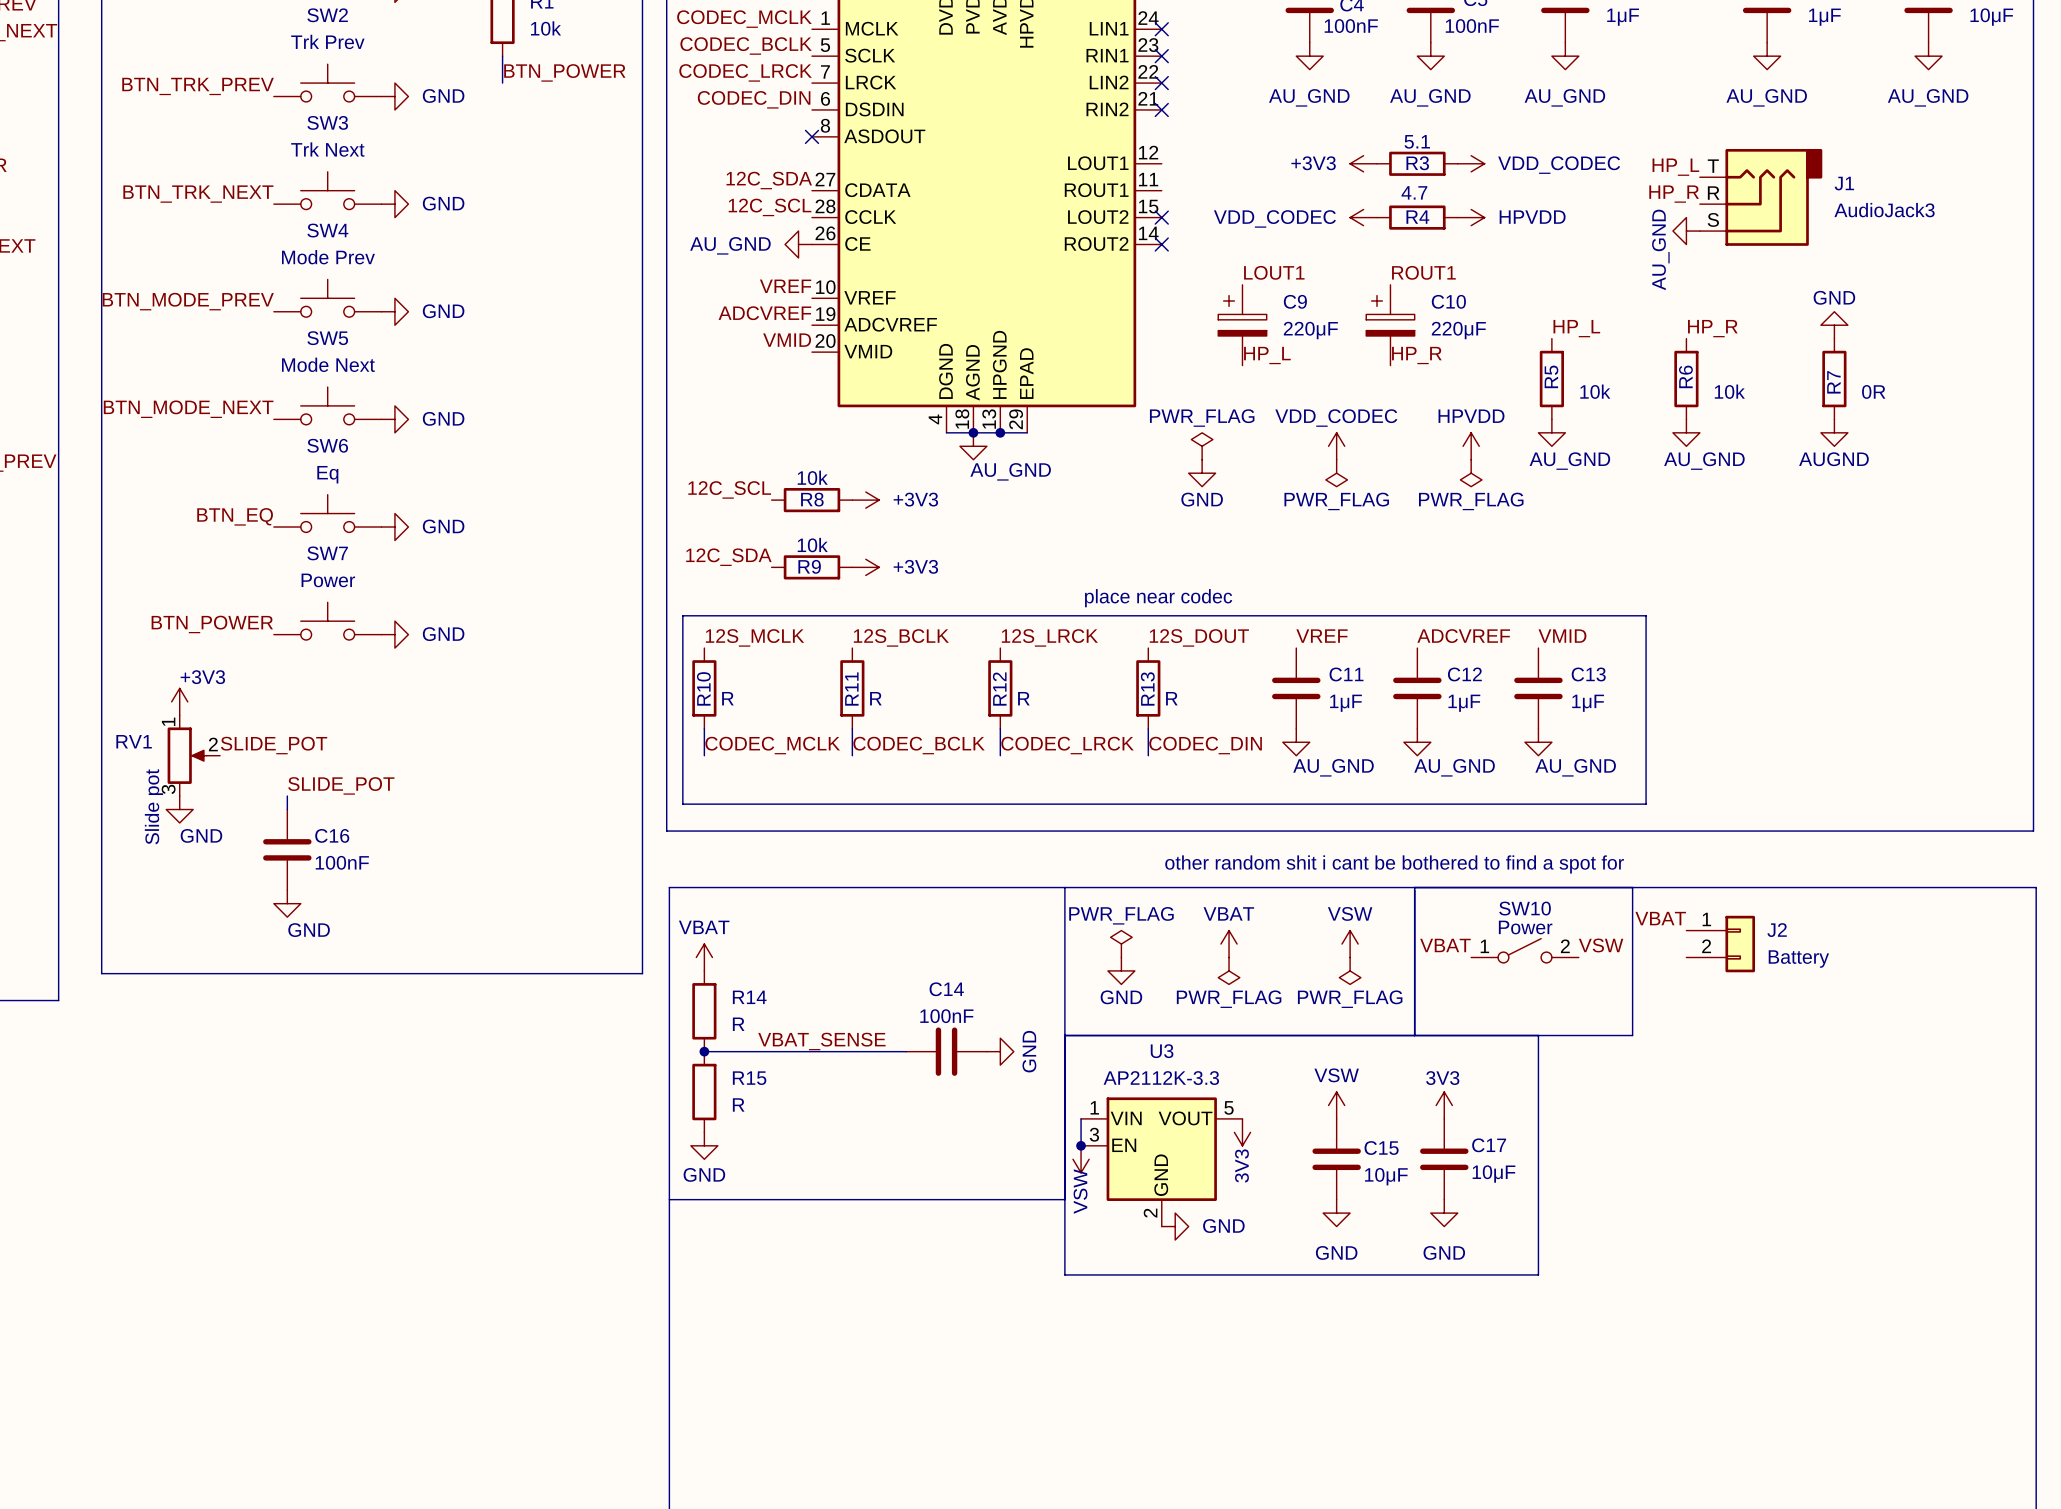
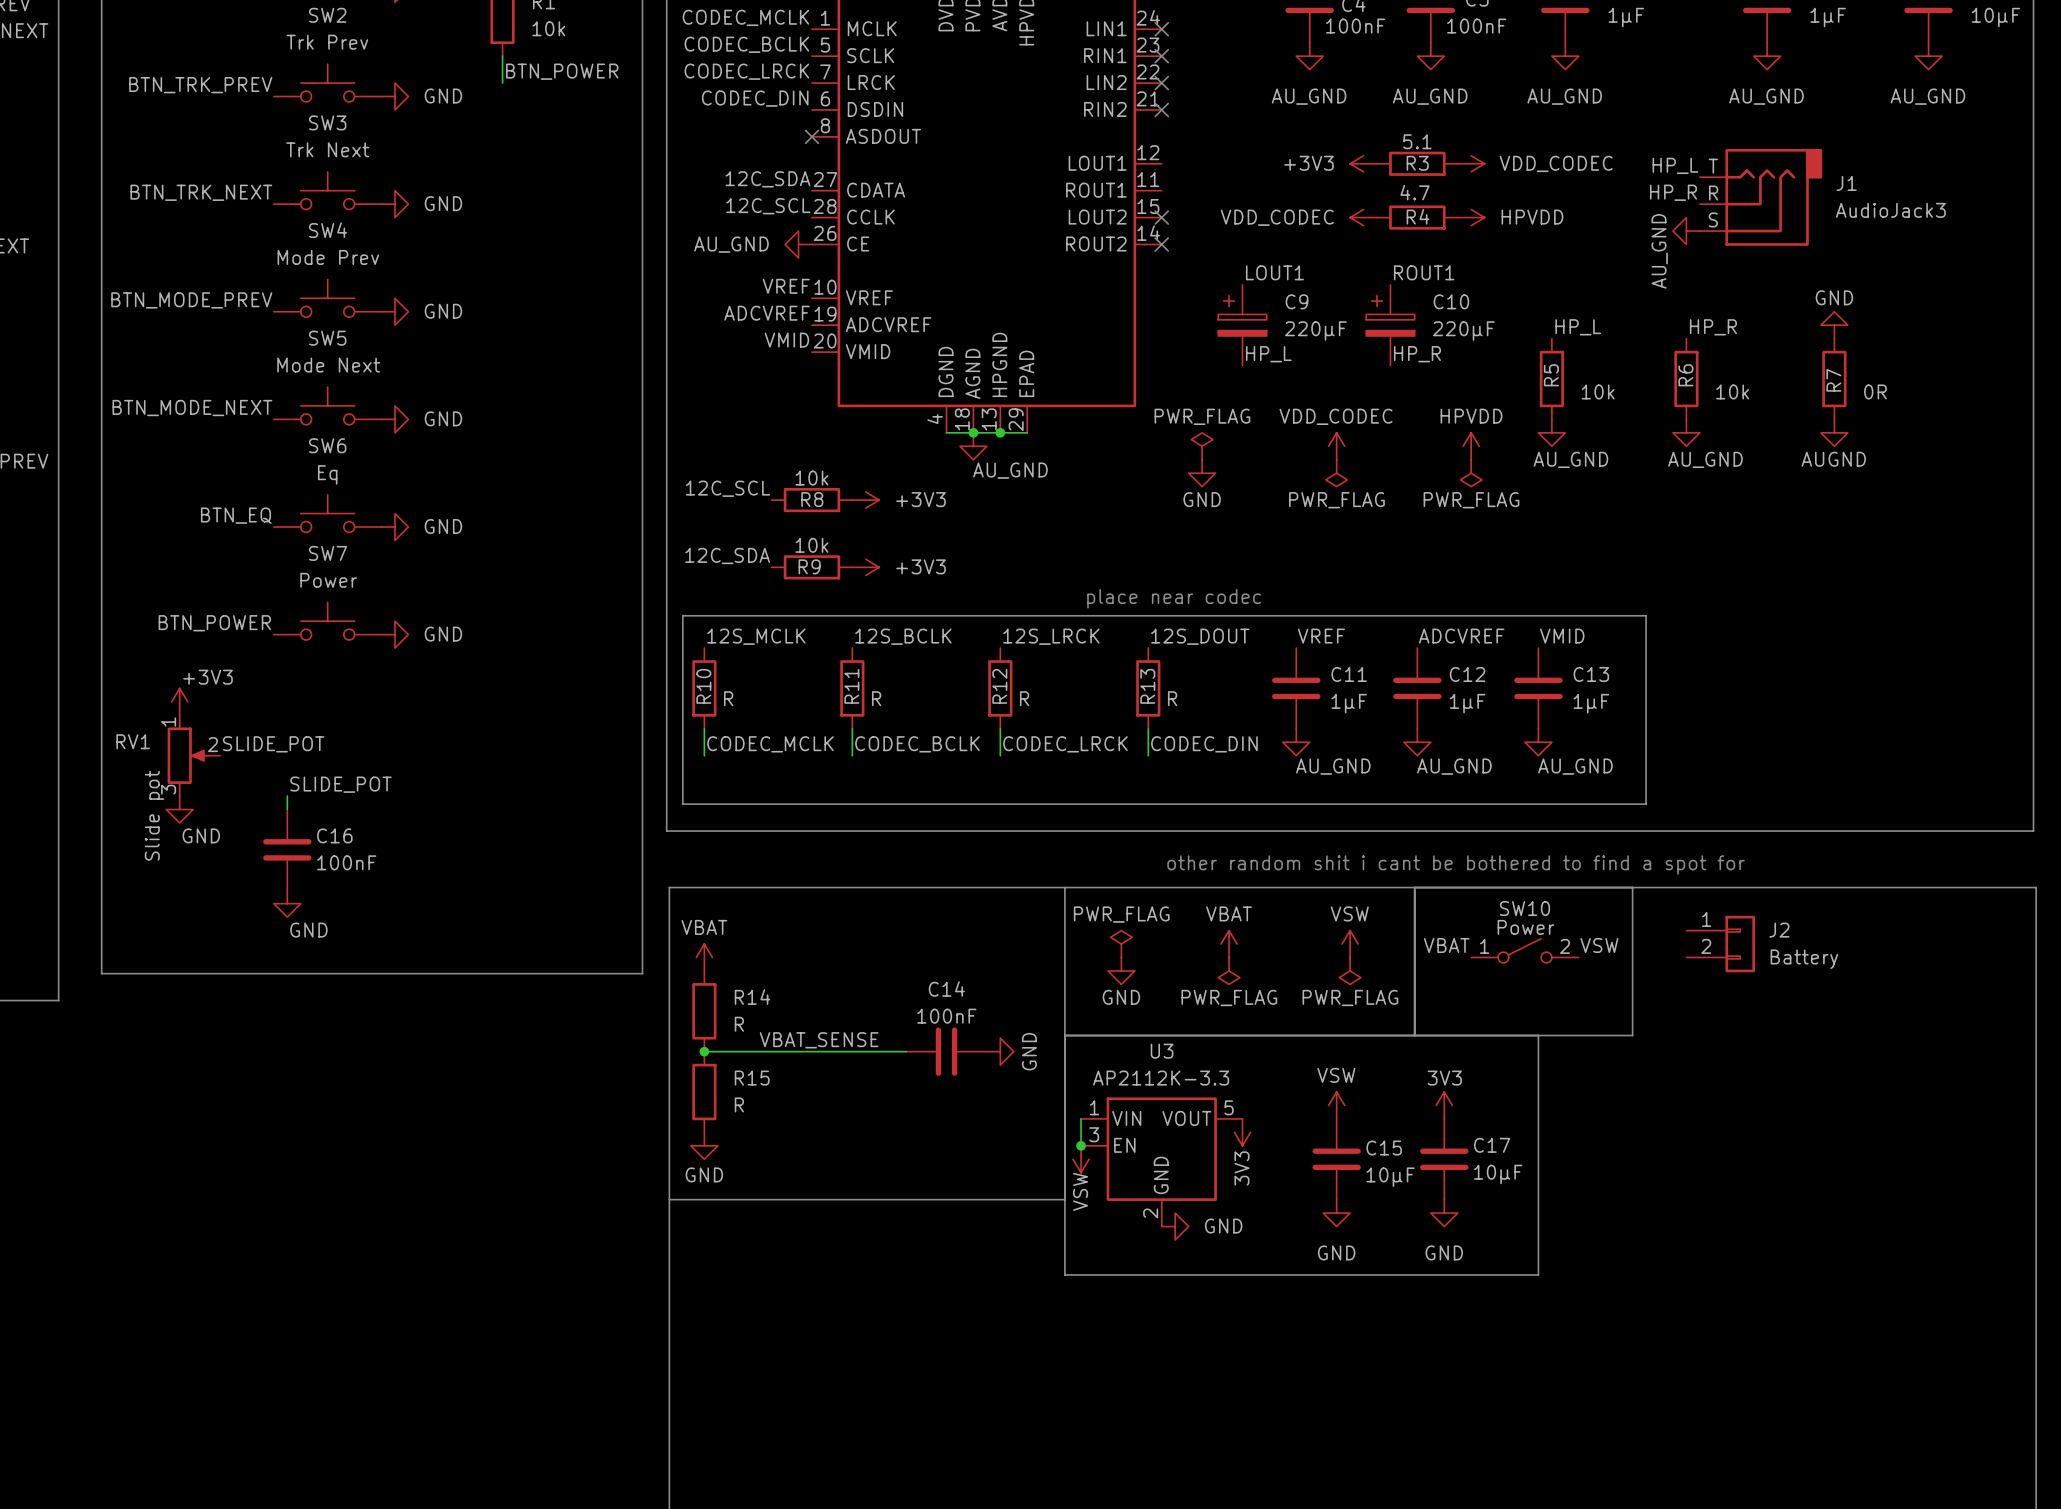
label: VBAT (1660, 918) -> none

